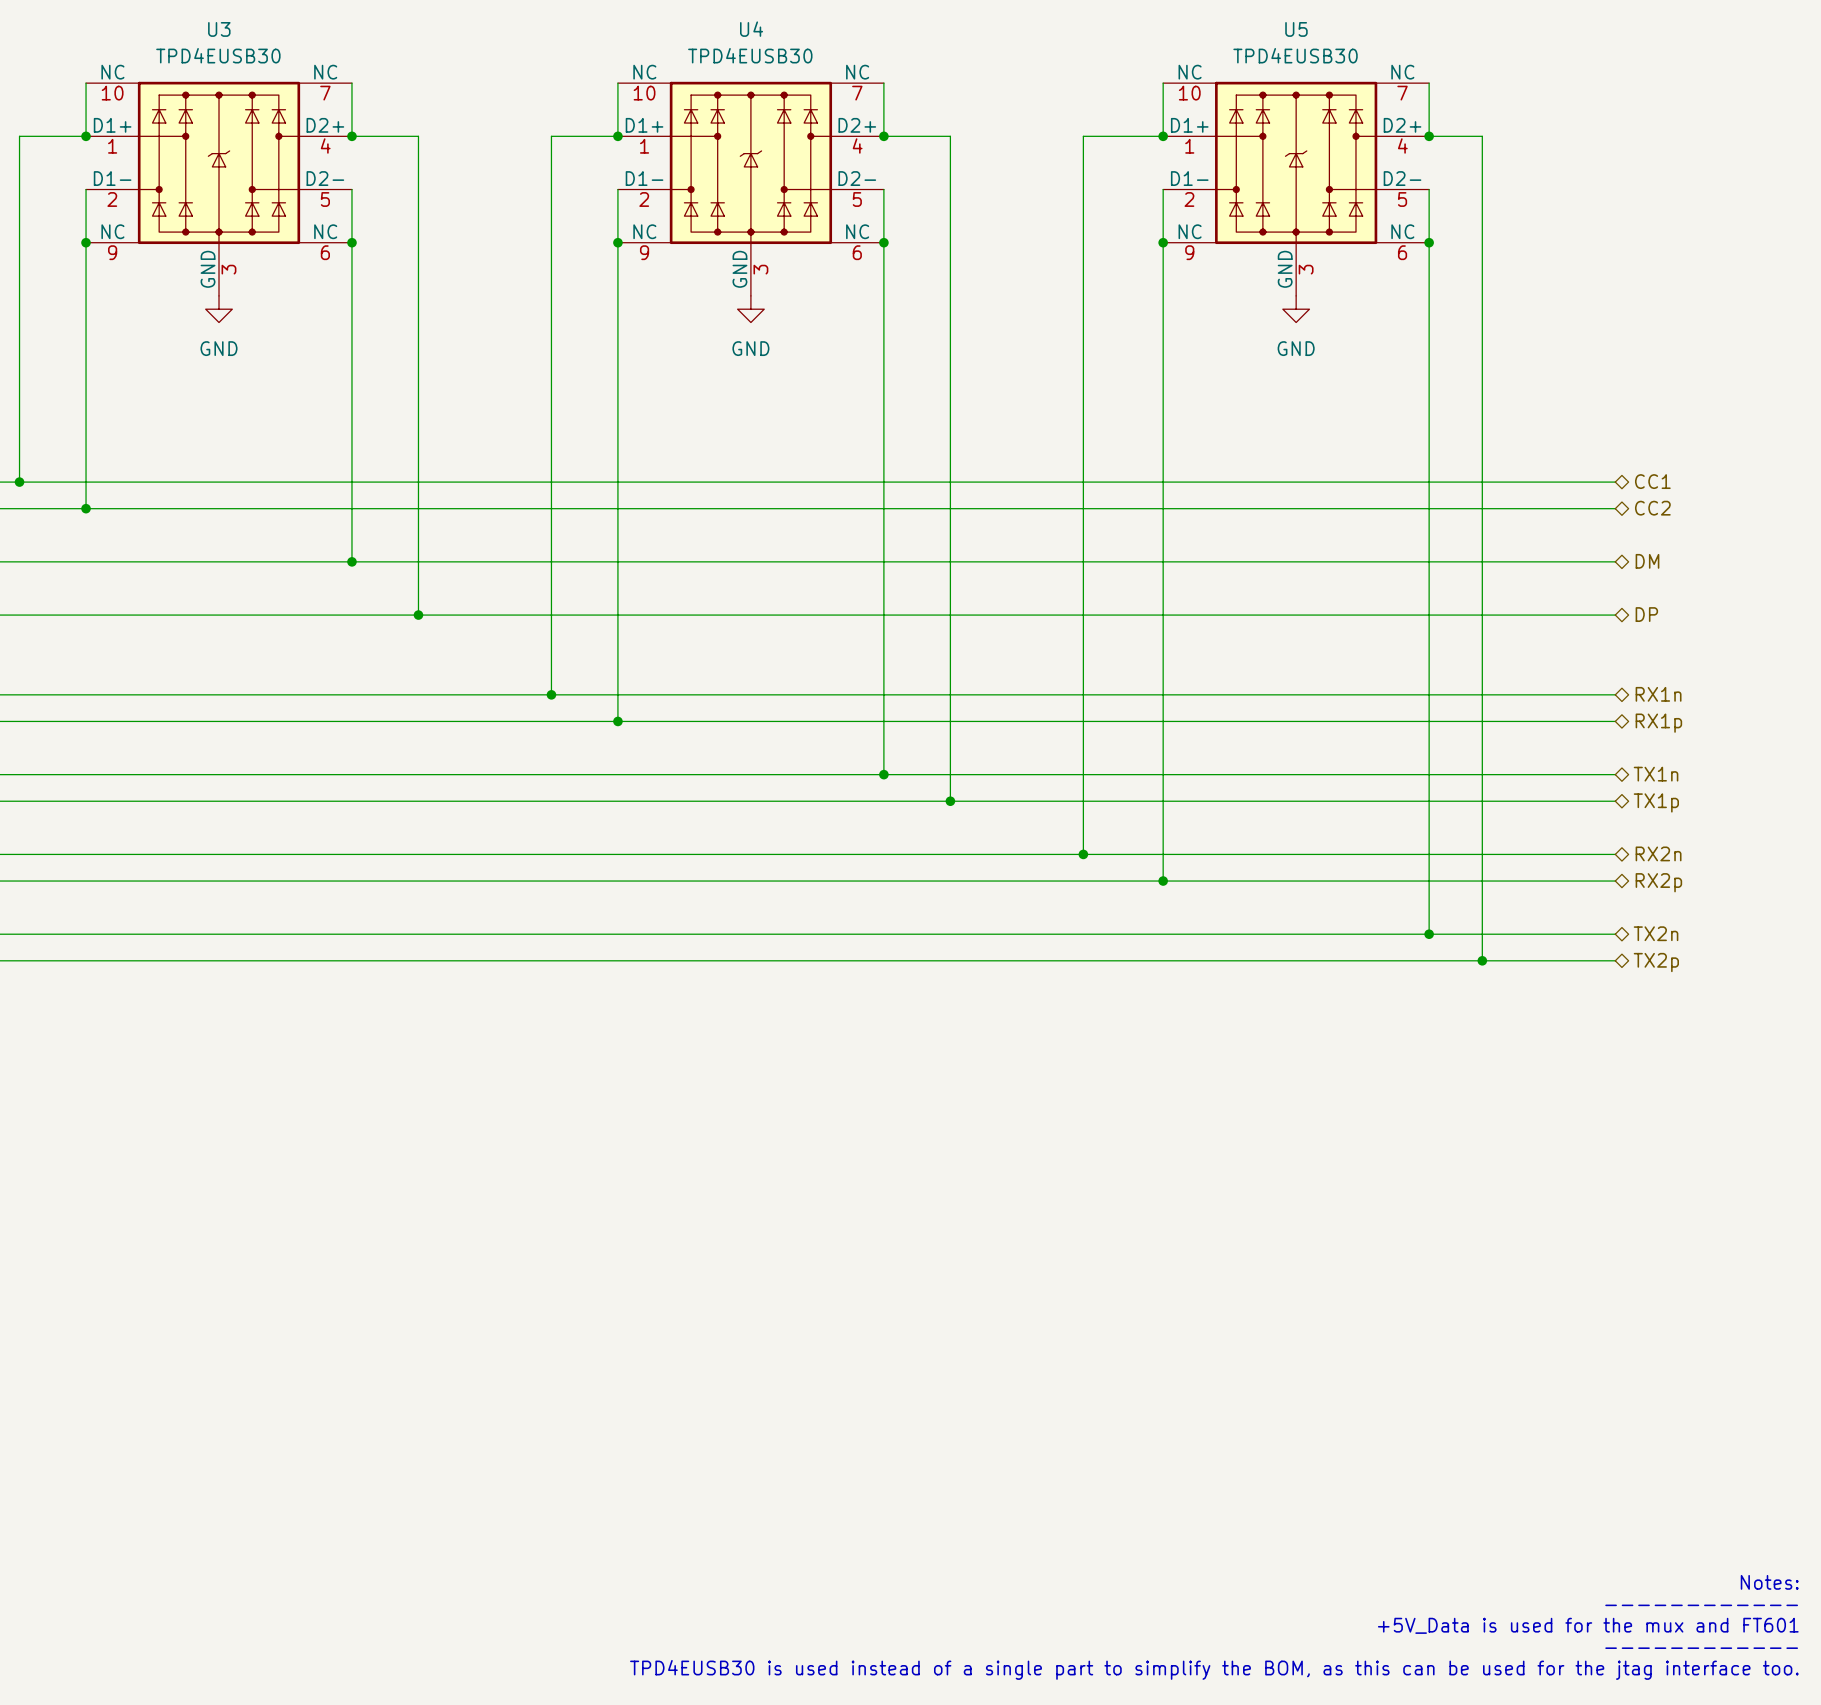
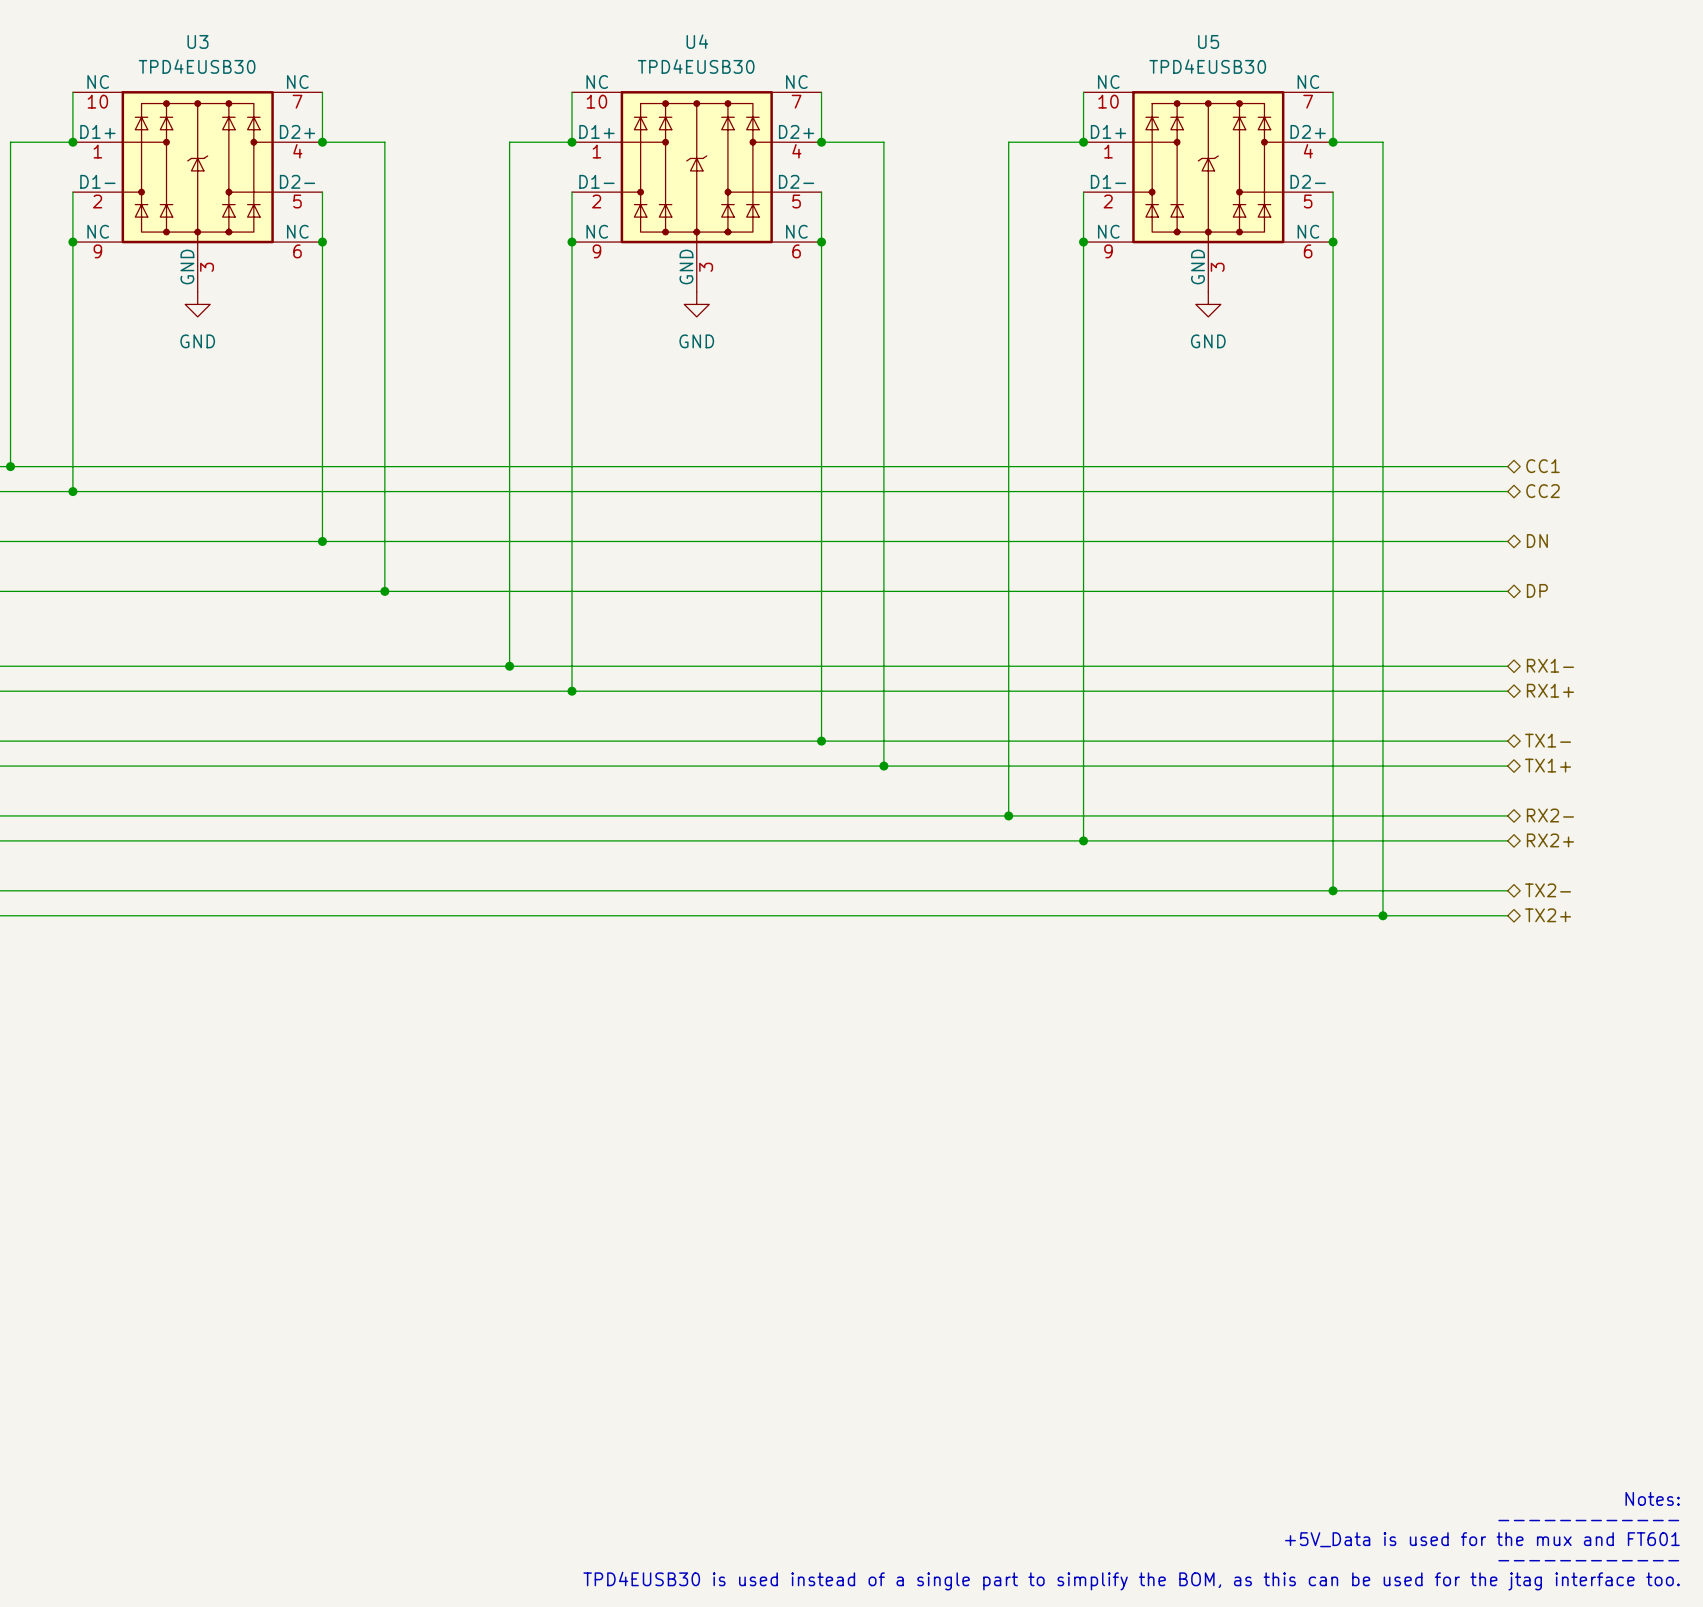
hierarchical label: DM (1647, 561) -> DN (1537, 541)
hierarchical label: RX1n (1658, 694) -> RX1- (1550, 665)
hierarchical label: RX1p (1658, 723) -> RX1+ (1550, 690)
hierarchical label: TX1n (1656, 774) -> TX1- (1548, 740)
hierarchical label: TX1p (1656, 802) -> TX1+ (1548, 765)
hierarchical label: RX2n (1658, 853) -> RX2- (1550, 815)
hierarchical label: RX2p (1658, 882) -> RX2+ (1550, 840)
hierarchical label: TX2n (1656, 933) -> TX2- (1548, 890)
hierarchical label: TX2p (1656, 962) -> TX2+ (1548, 915)

